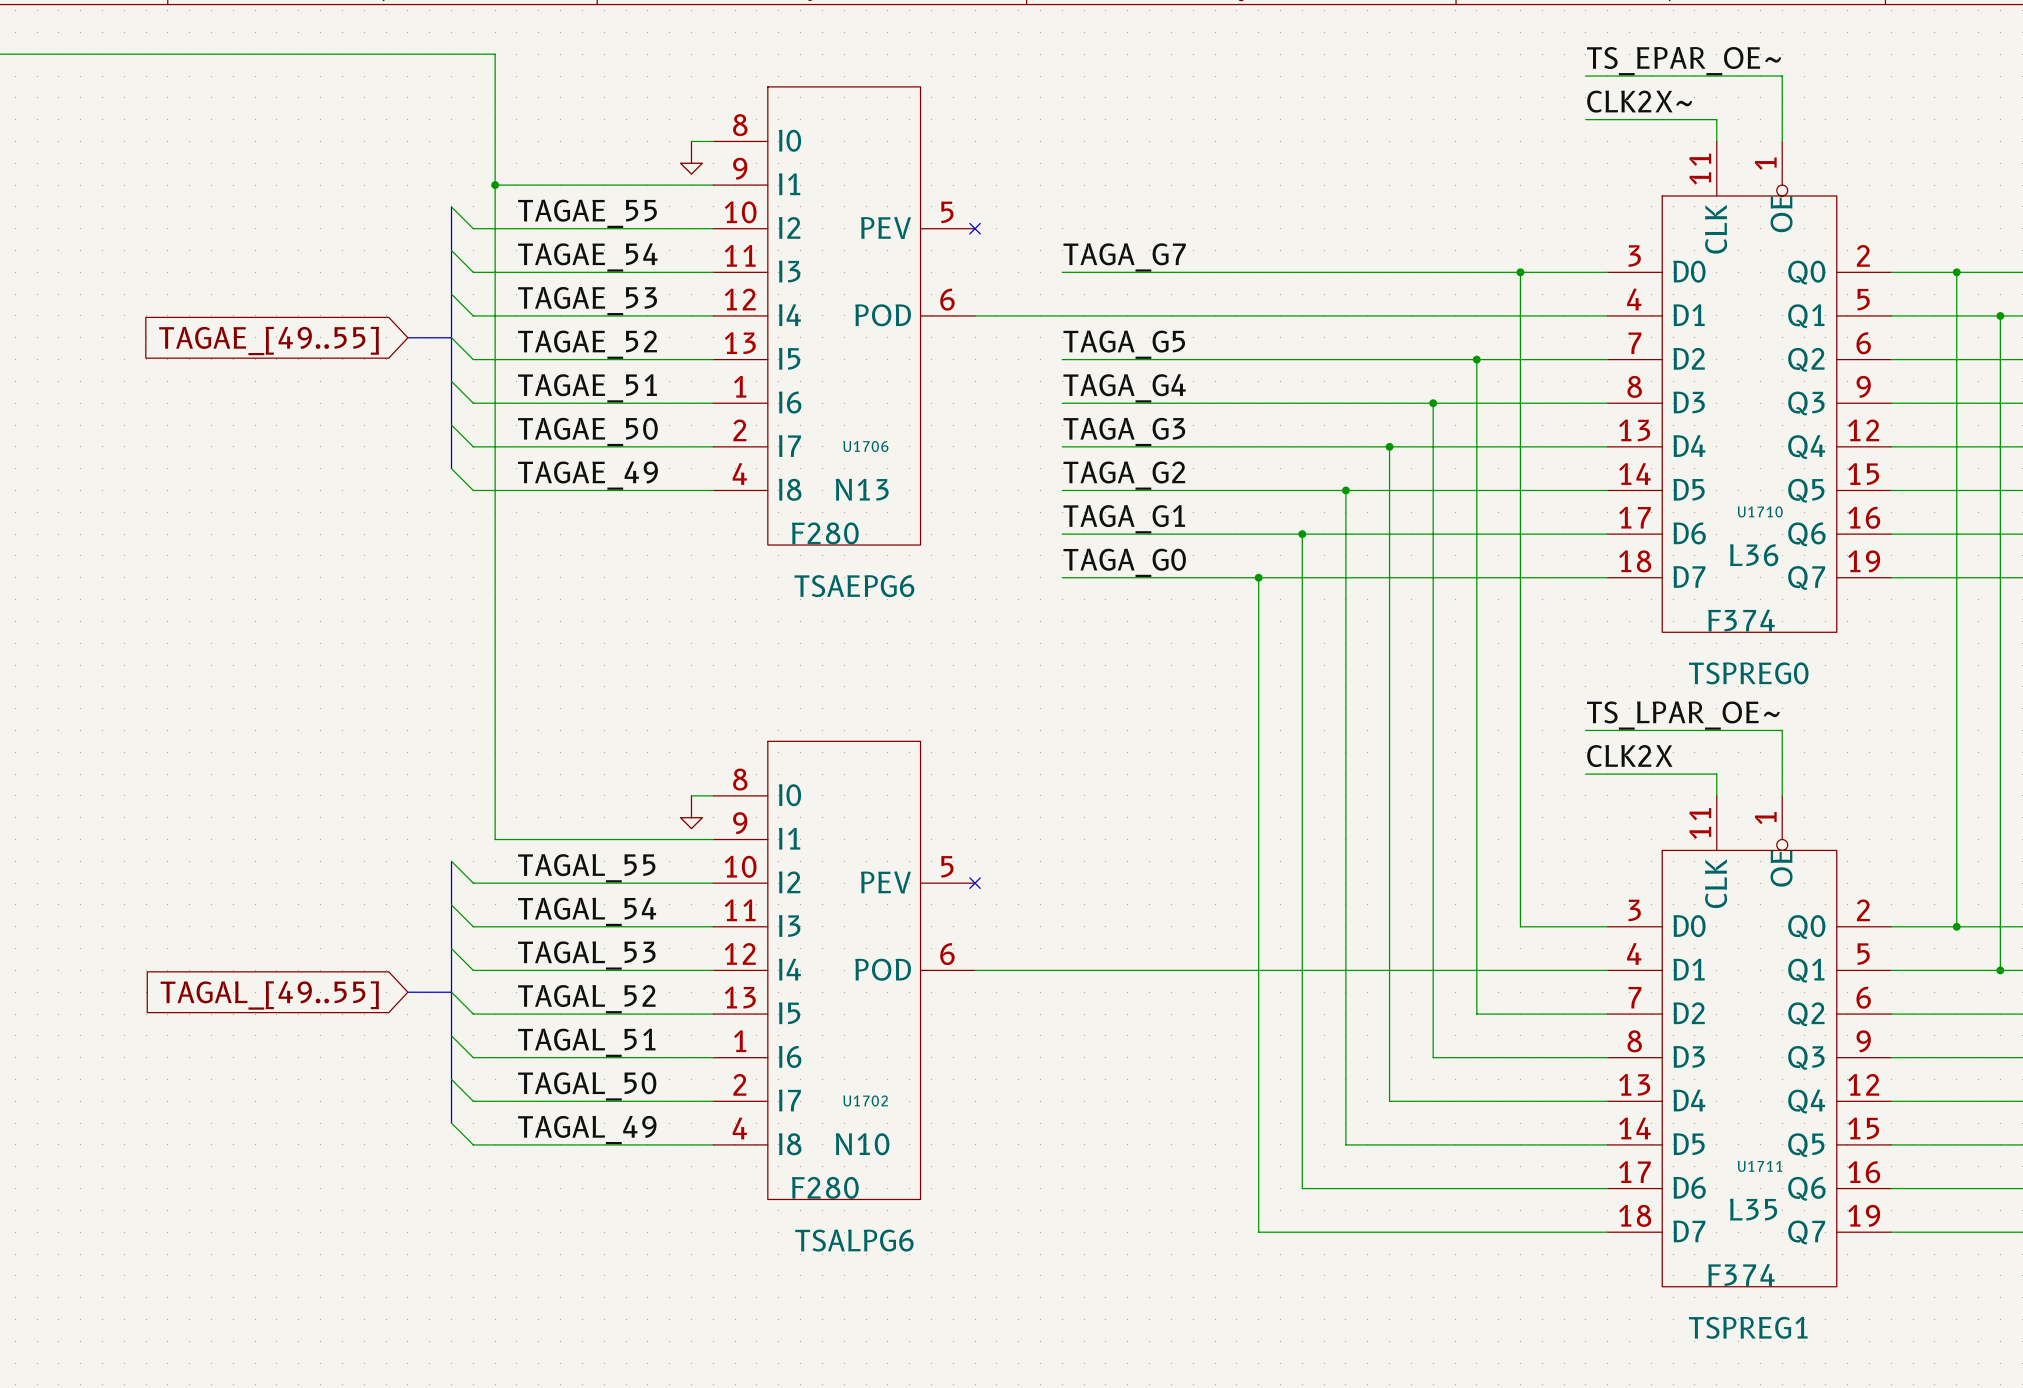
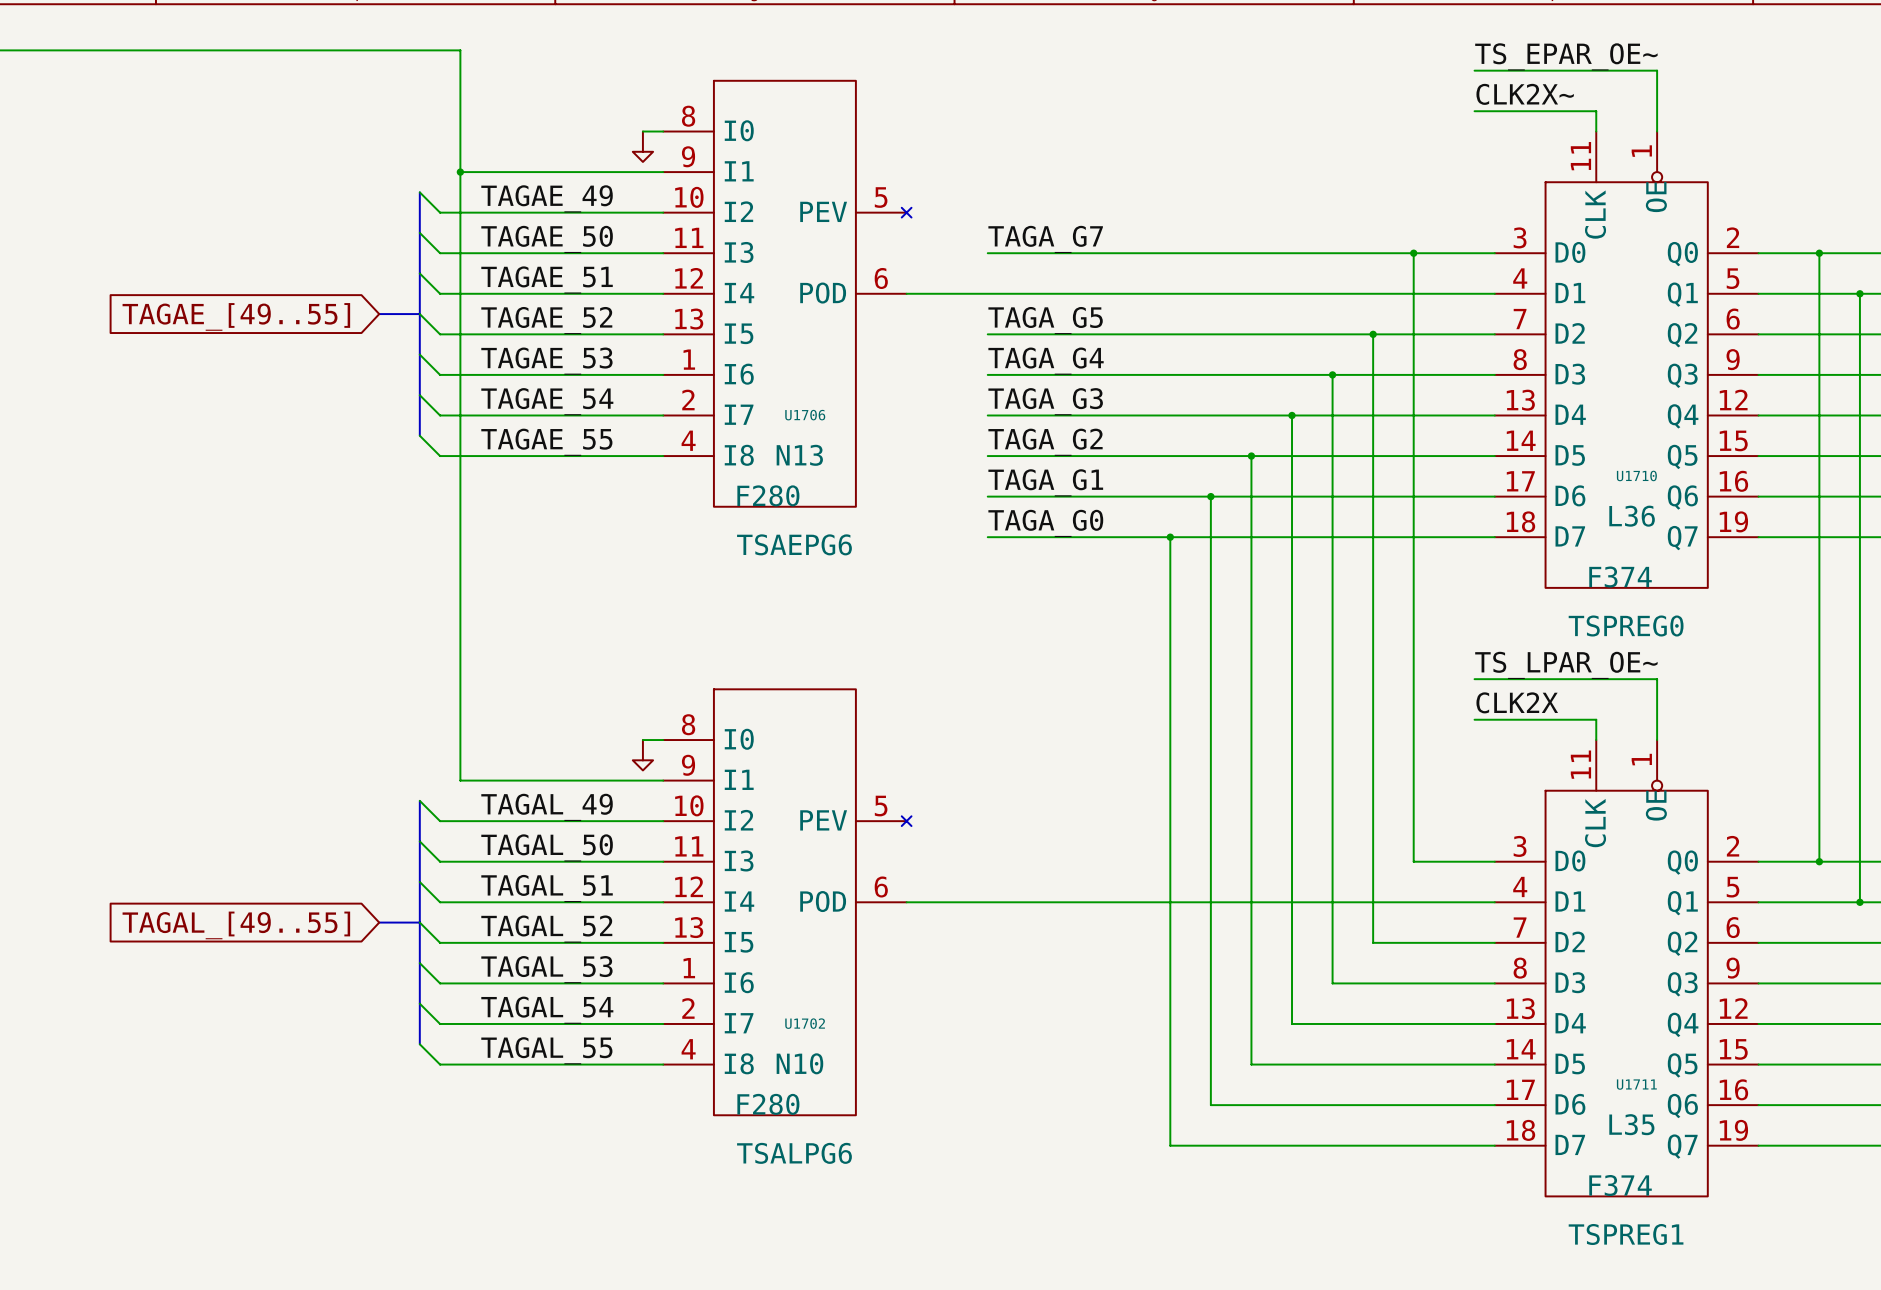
label: TAGAE_55 (587, 213) -> TAGAE_49 (547, 198)
label: TAGAE_54 (587, 257) -> TAGAE_50 (547, 239)
label: TAGAE_53 (587, 301) -> TAGAE_51 (547, 280)
label: TAGAE_51 (587, 388) -> TAGAE_53 (546, 361)
label: TAGAE_50 (587, 431) -> TAGAE_54 (547, 401)
label: TAGAE_49 (588, 475) -> TAGAE_55 (546, 442)
label: TAGAL_55 (586, 868) -> TAGAL_49 (547, 807)
label: TAGAL_54 (587, 911) -> TAGAL_50 (547, 847)
label: TAGAL_53 (586, 955) -> TAGAL_51 (547, 888)
label: TAGAL_51 (586, 1042) -> TAGAL_53 (546, 969)
label: TAGAL_50 (587, 1086) -> TAGAL_54 (547, 1010)
label: TAGAL_49 (587, 1130) -> TAGAL_55 (546, 1050)

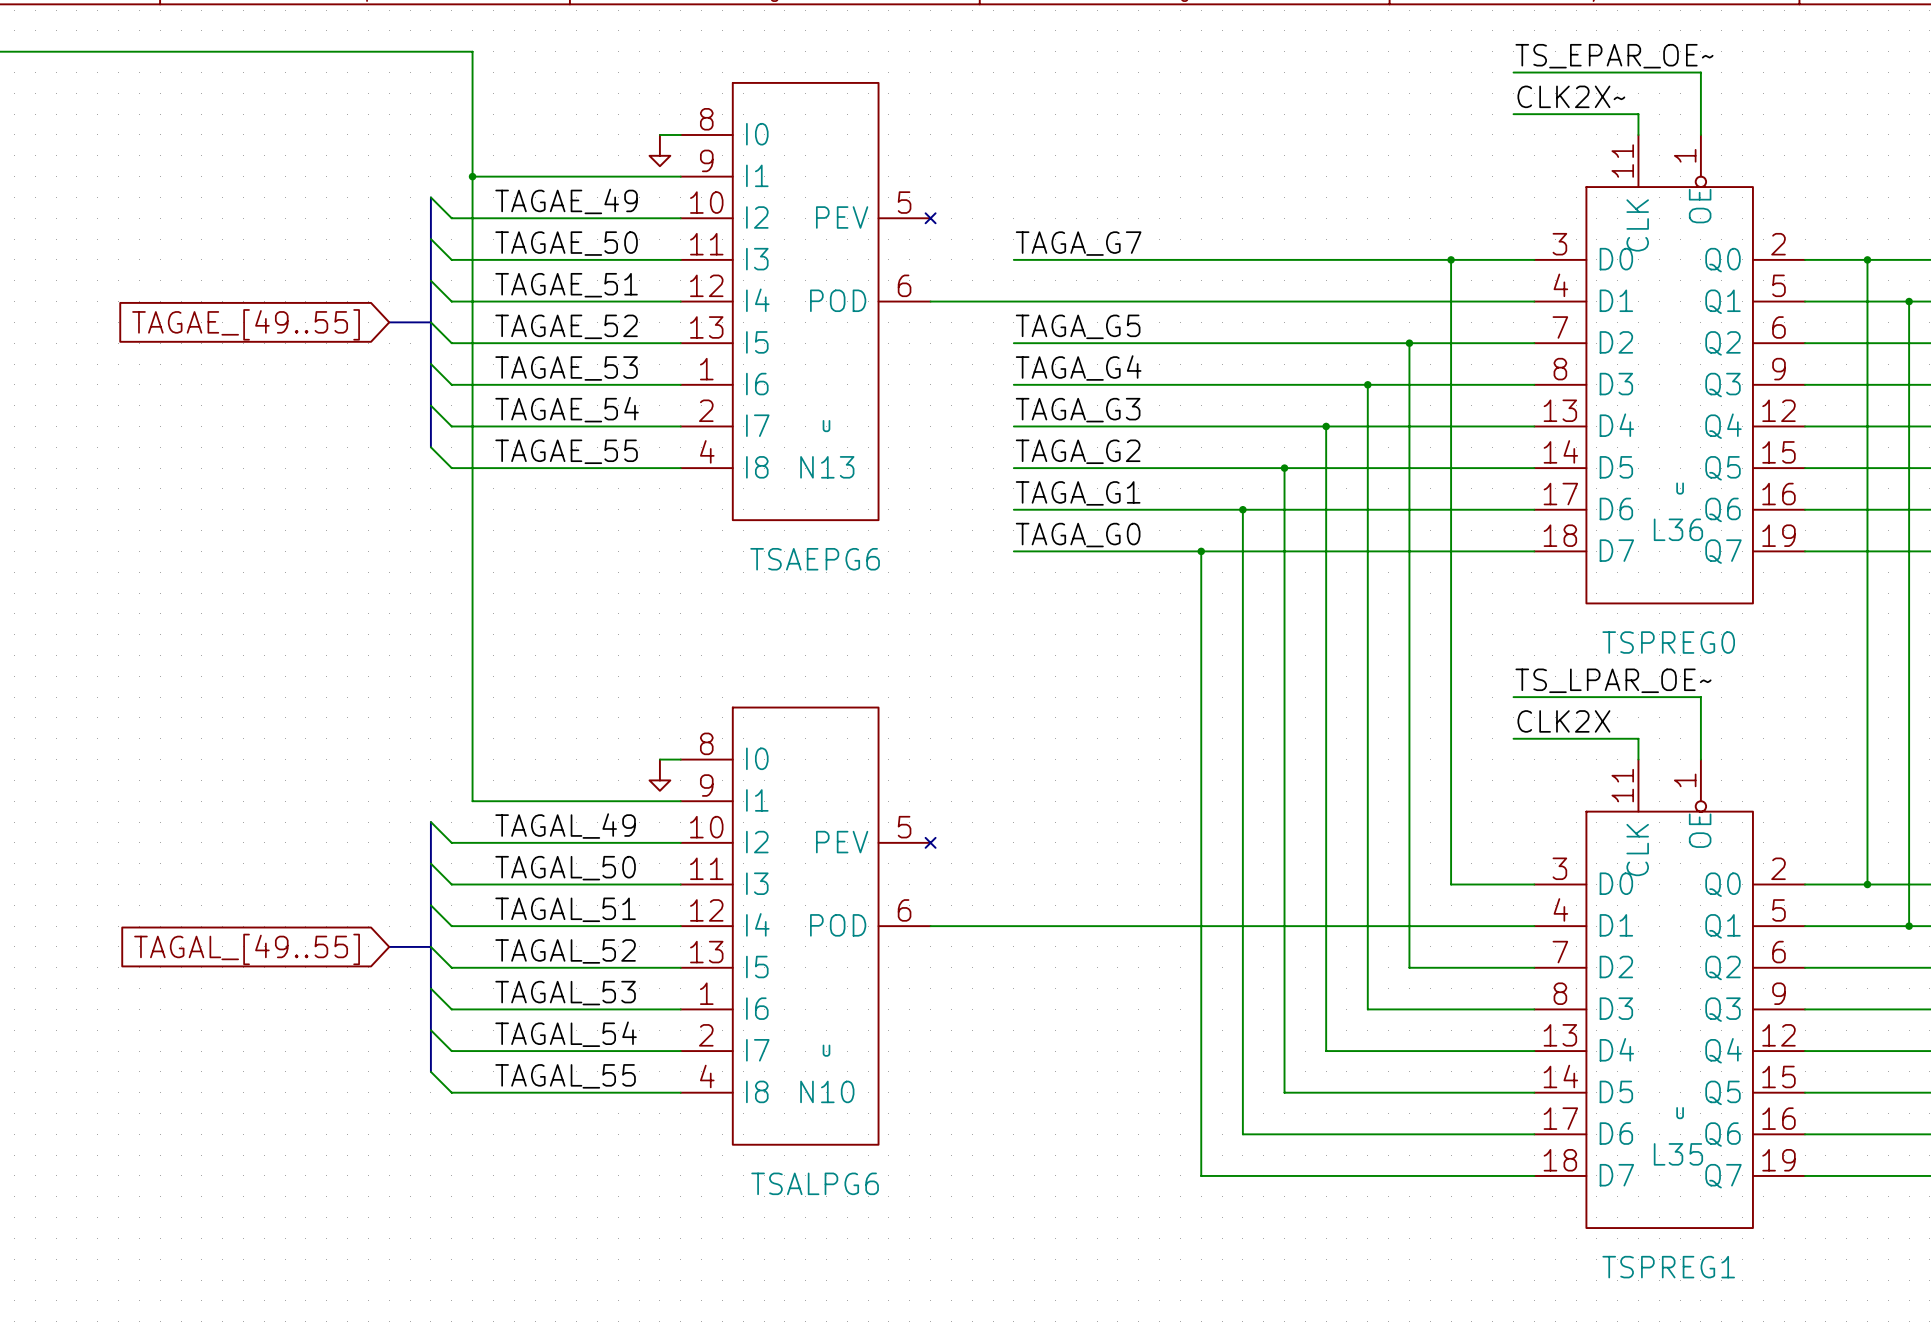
U1706 name: U1706 (805, 415) -> U (826, 426)
U1710 name: U1710 (1636, 475) -> U (1680, 488)
U1706 value: F280 (768, 495) -> none
U1710 value: F374 (1620, 577) -> none
U1702 name: U1702 (805, 1023) -> U (826, 1050)
U1711 name: U1711 (1636, 1084) -> U (1680, 1113)
U1702 value: F280 (768, 1104) -> none
U1711 value: F374 (1620, 1185) -> none

